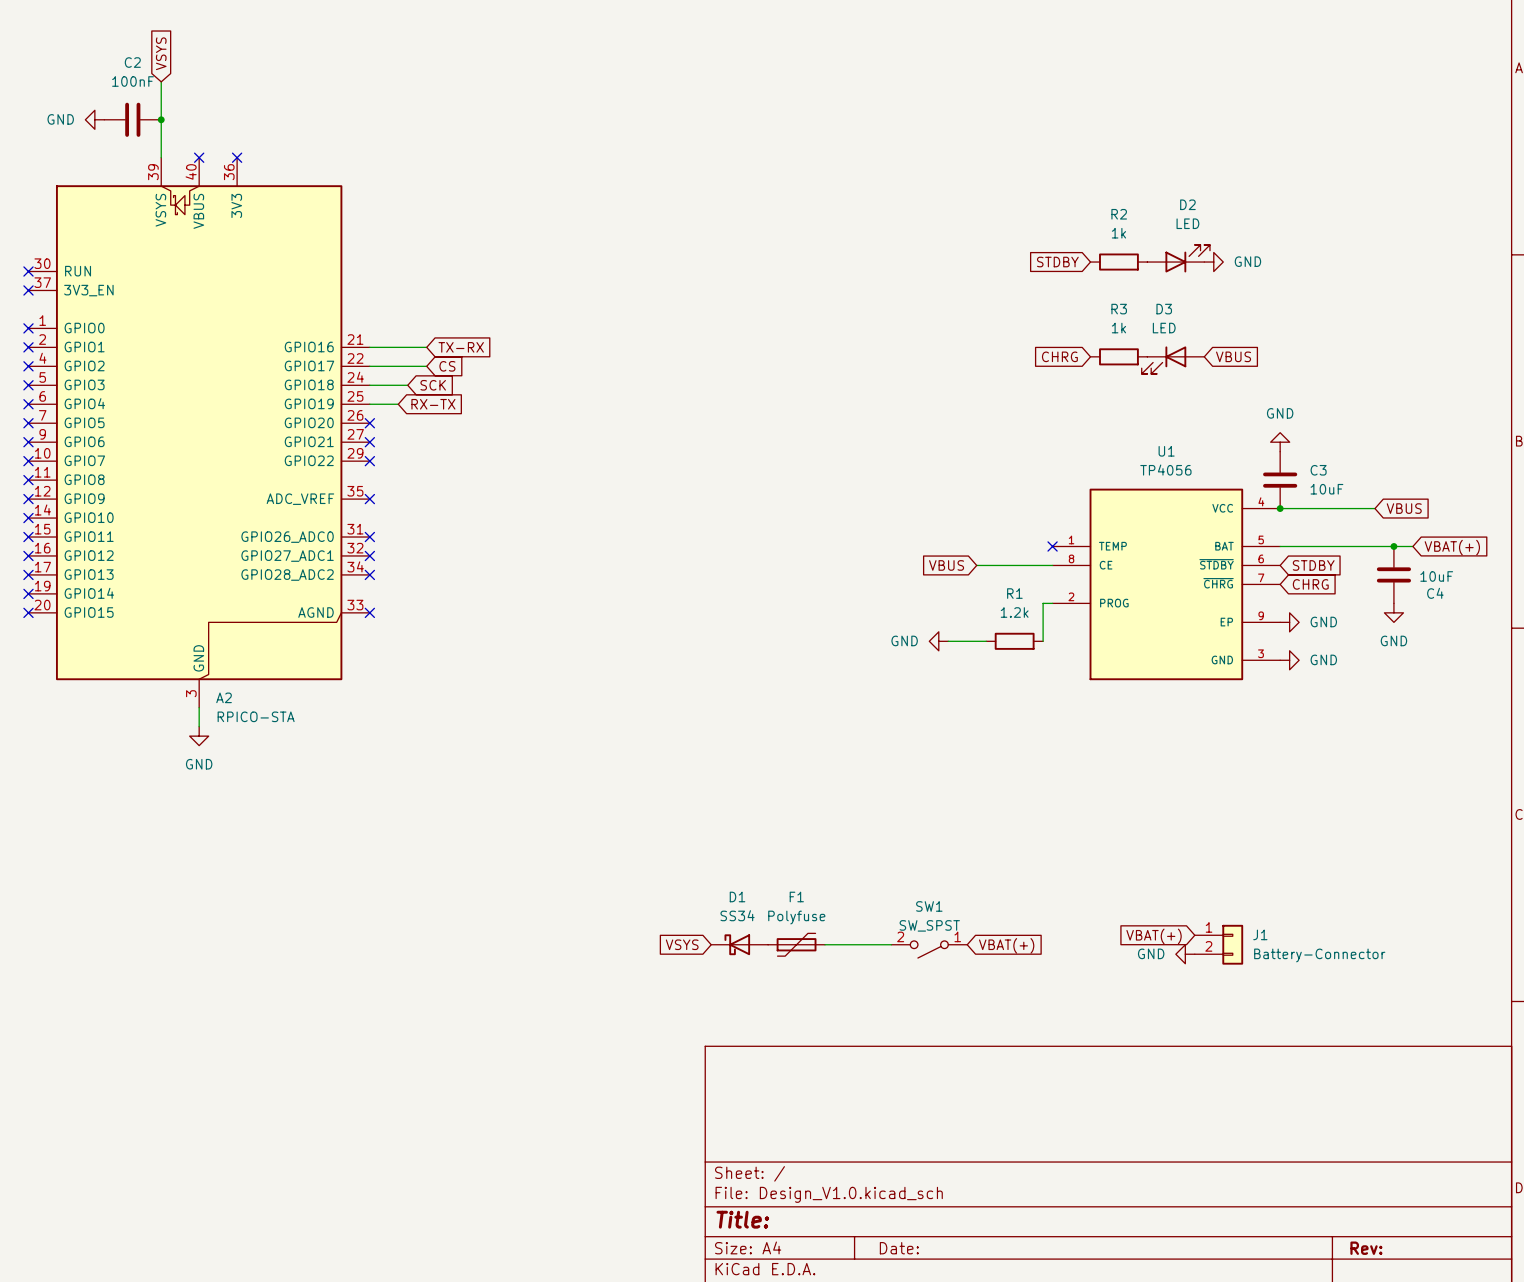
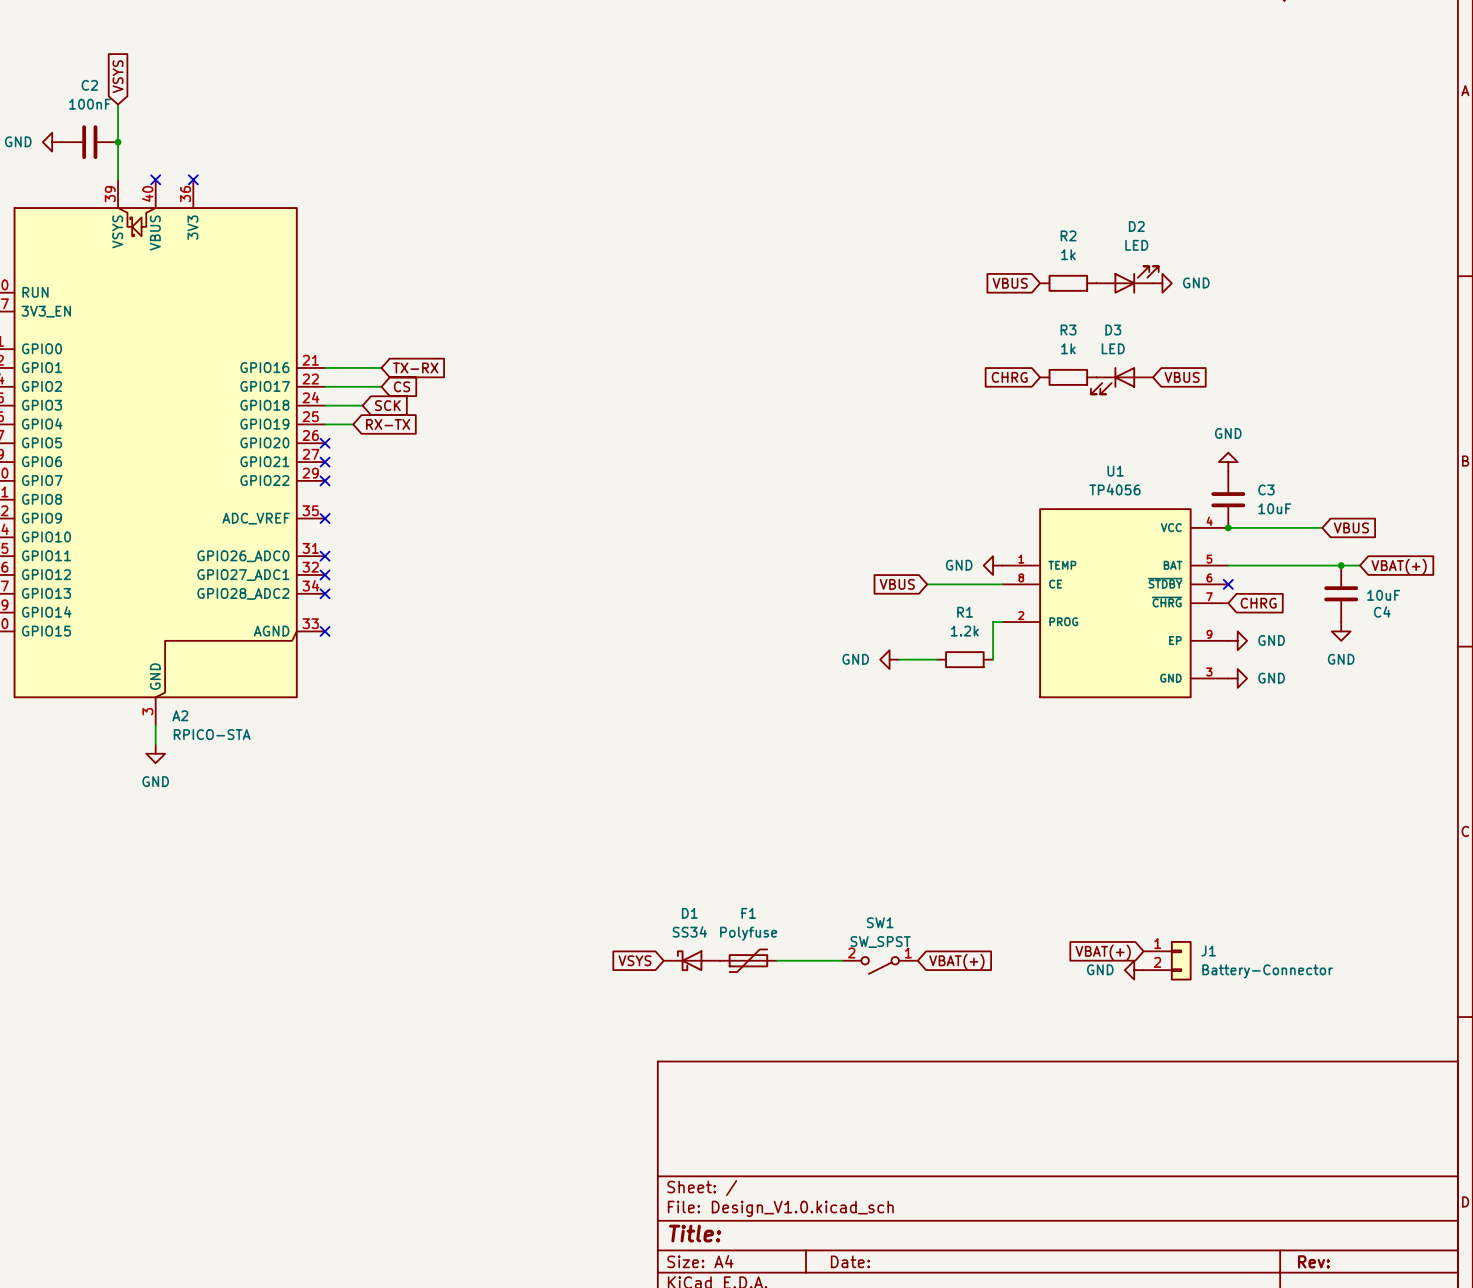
global label: STDBY (1057, 262) -> VBUS (1010, 283)
power symbol: none -> GND (993, 565)
no-connect mark: (1052, 546) -> none
no-connect mark: none -> (1228, 584)
global label: STDBY (1313, 565) -> none

